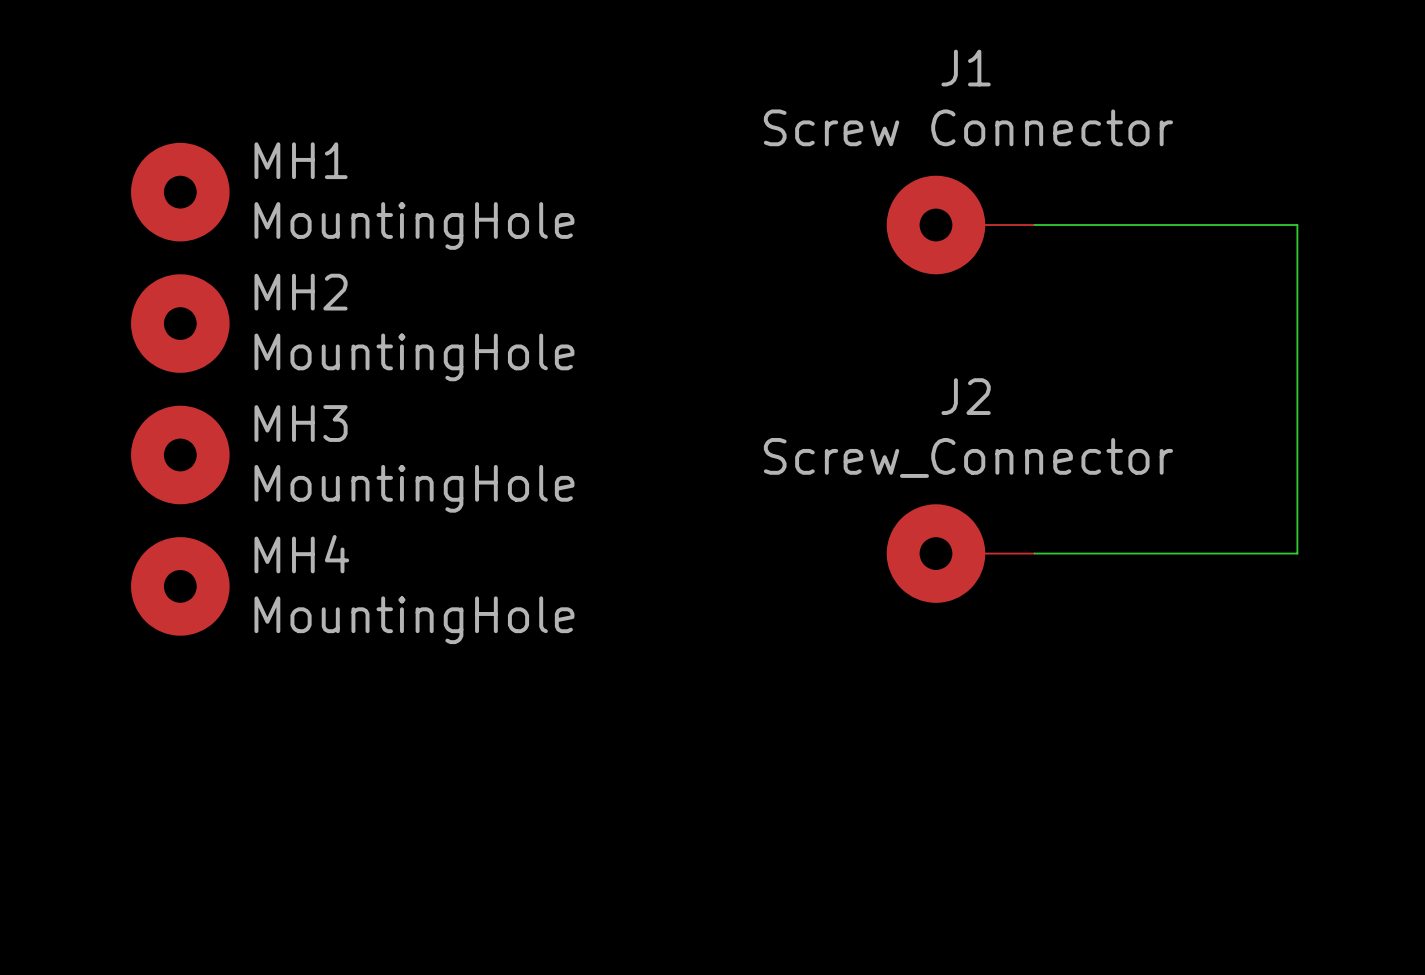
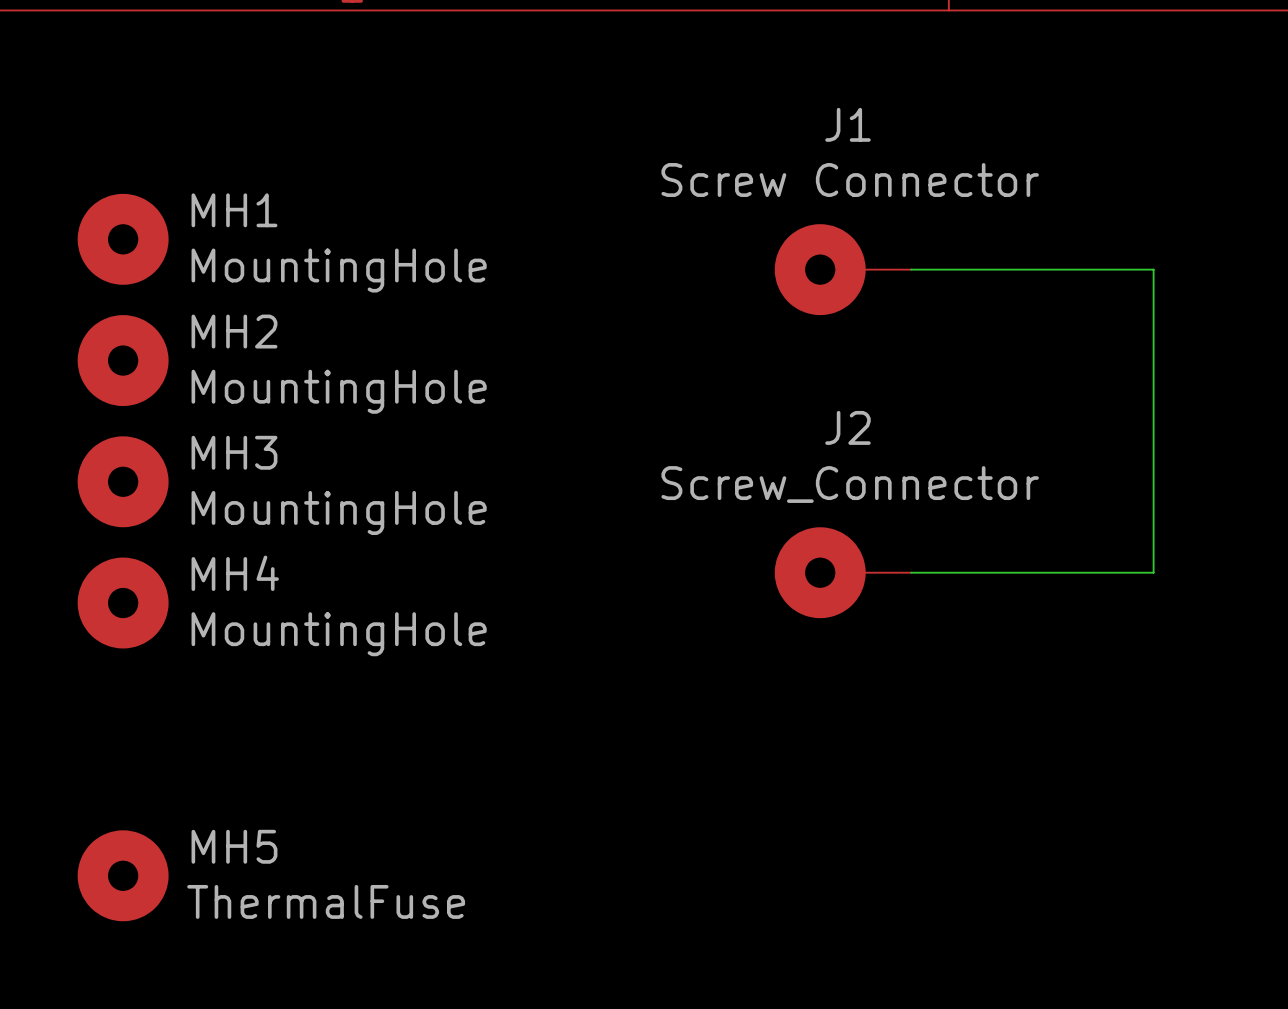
MH5: none -> ThermalFuse (123, 875)

